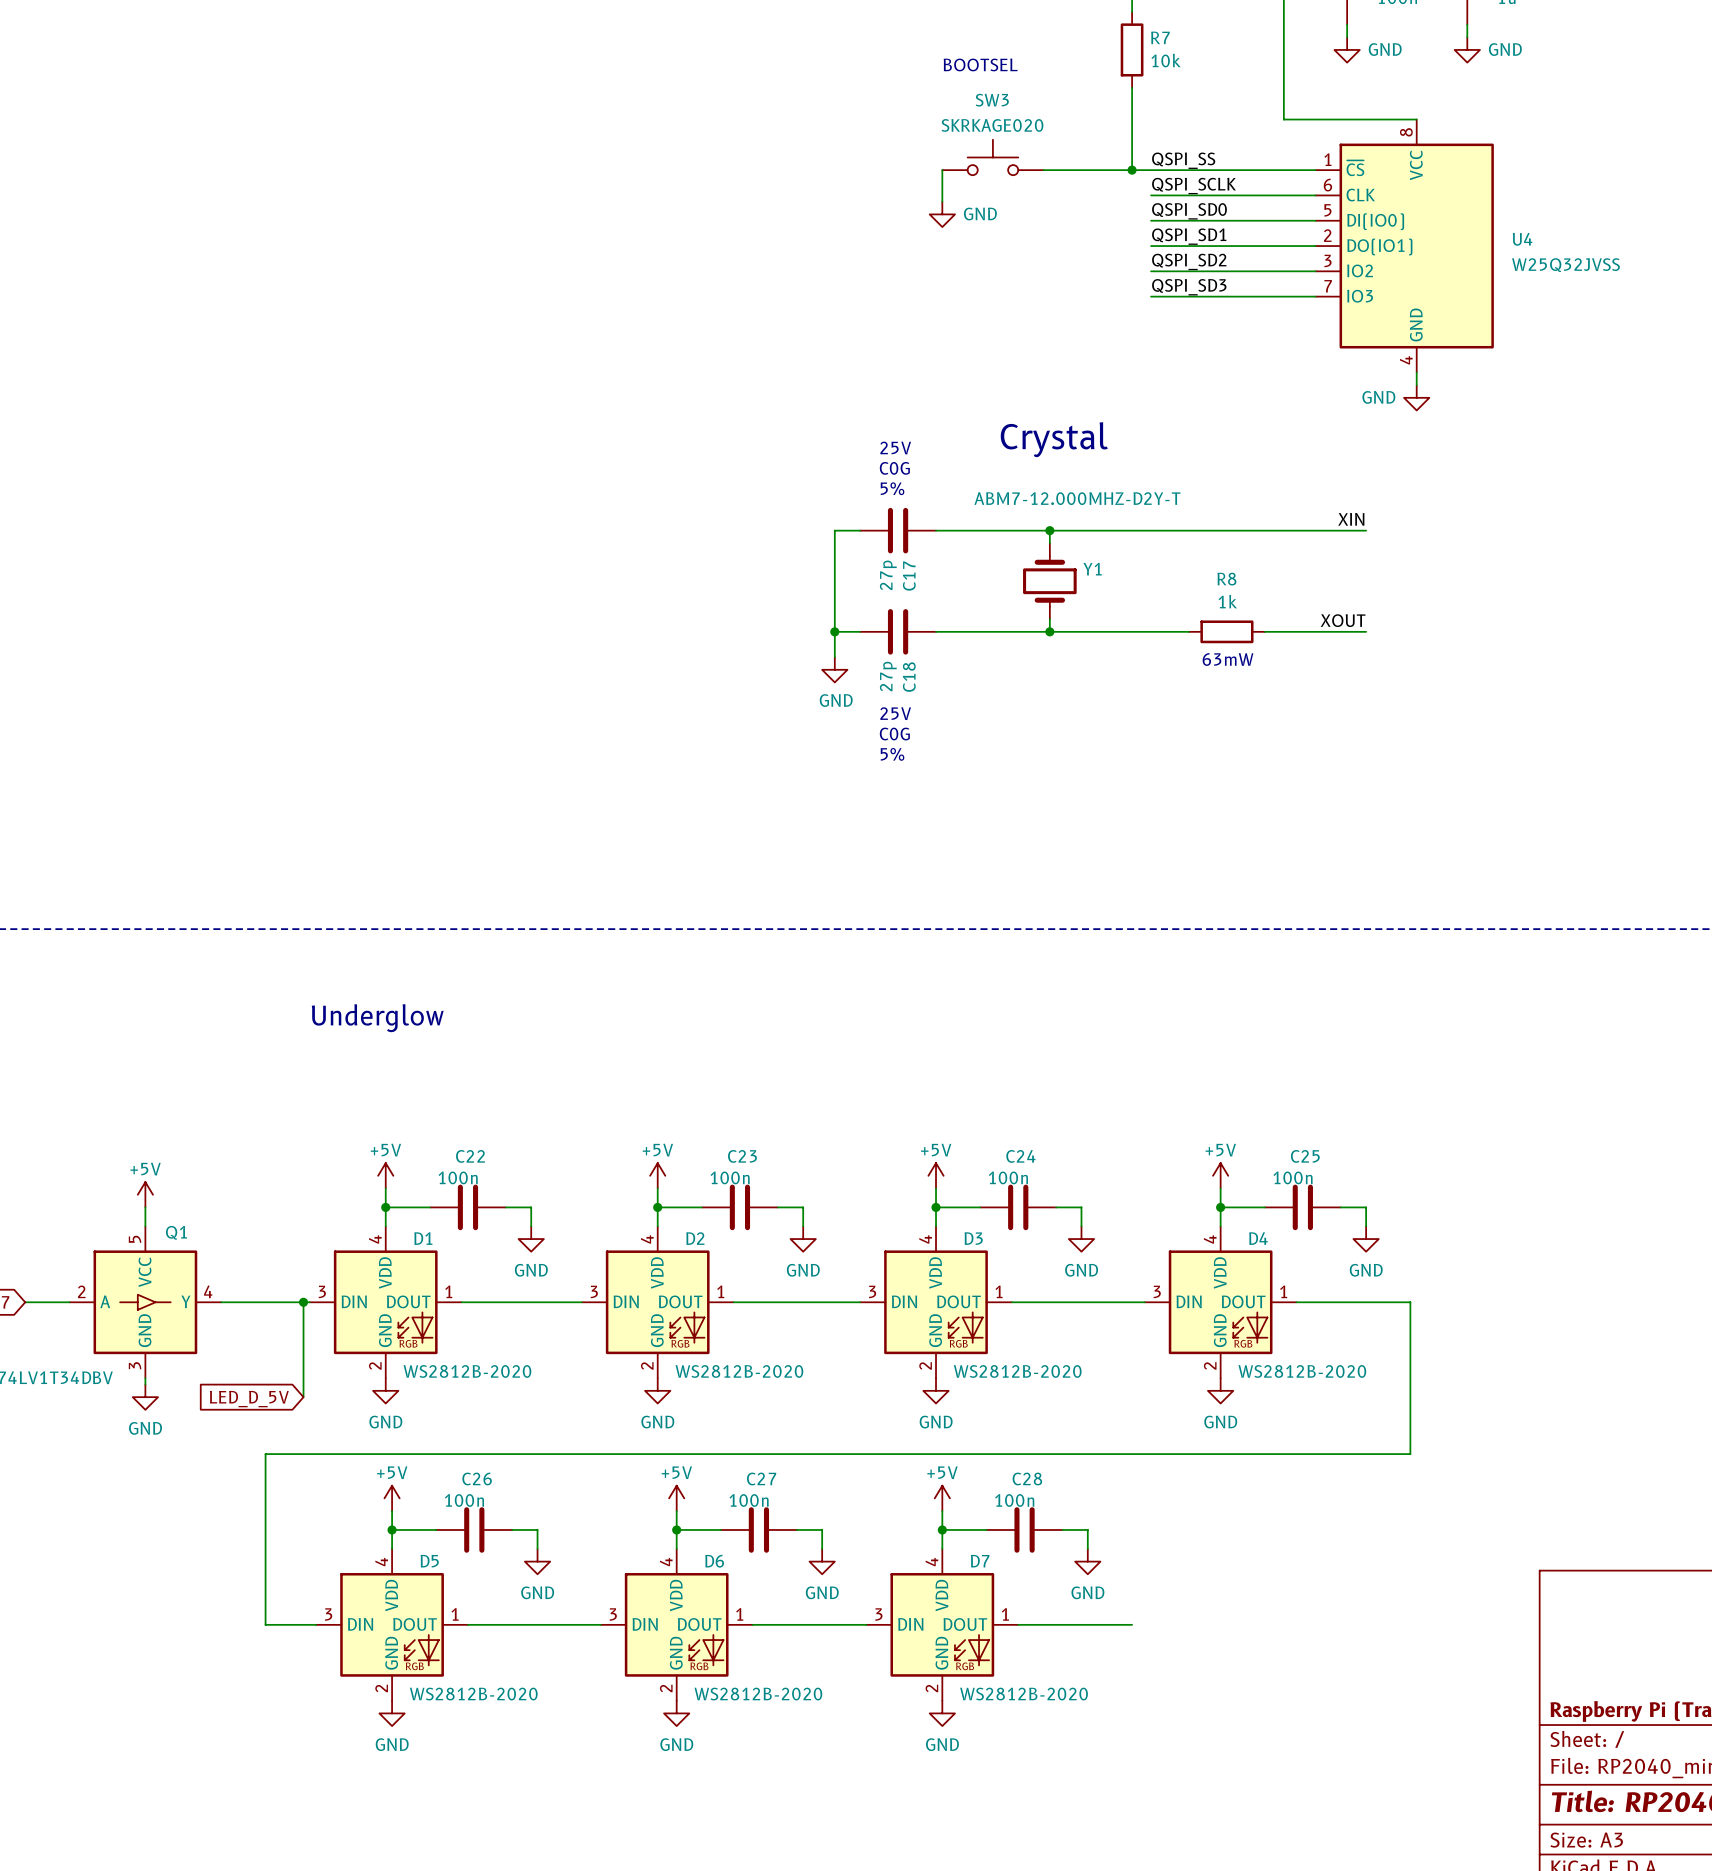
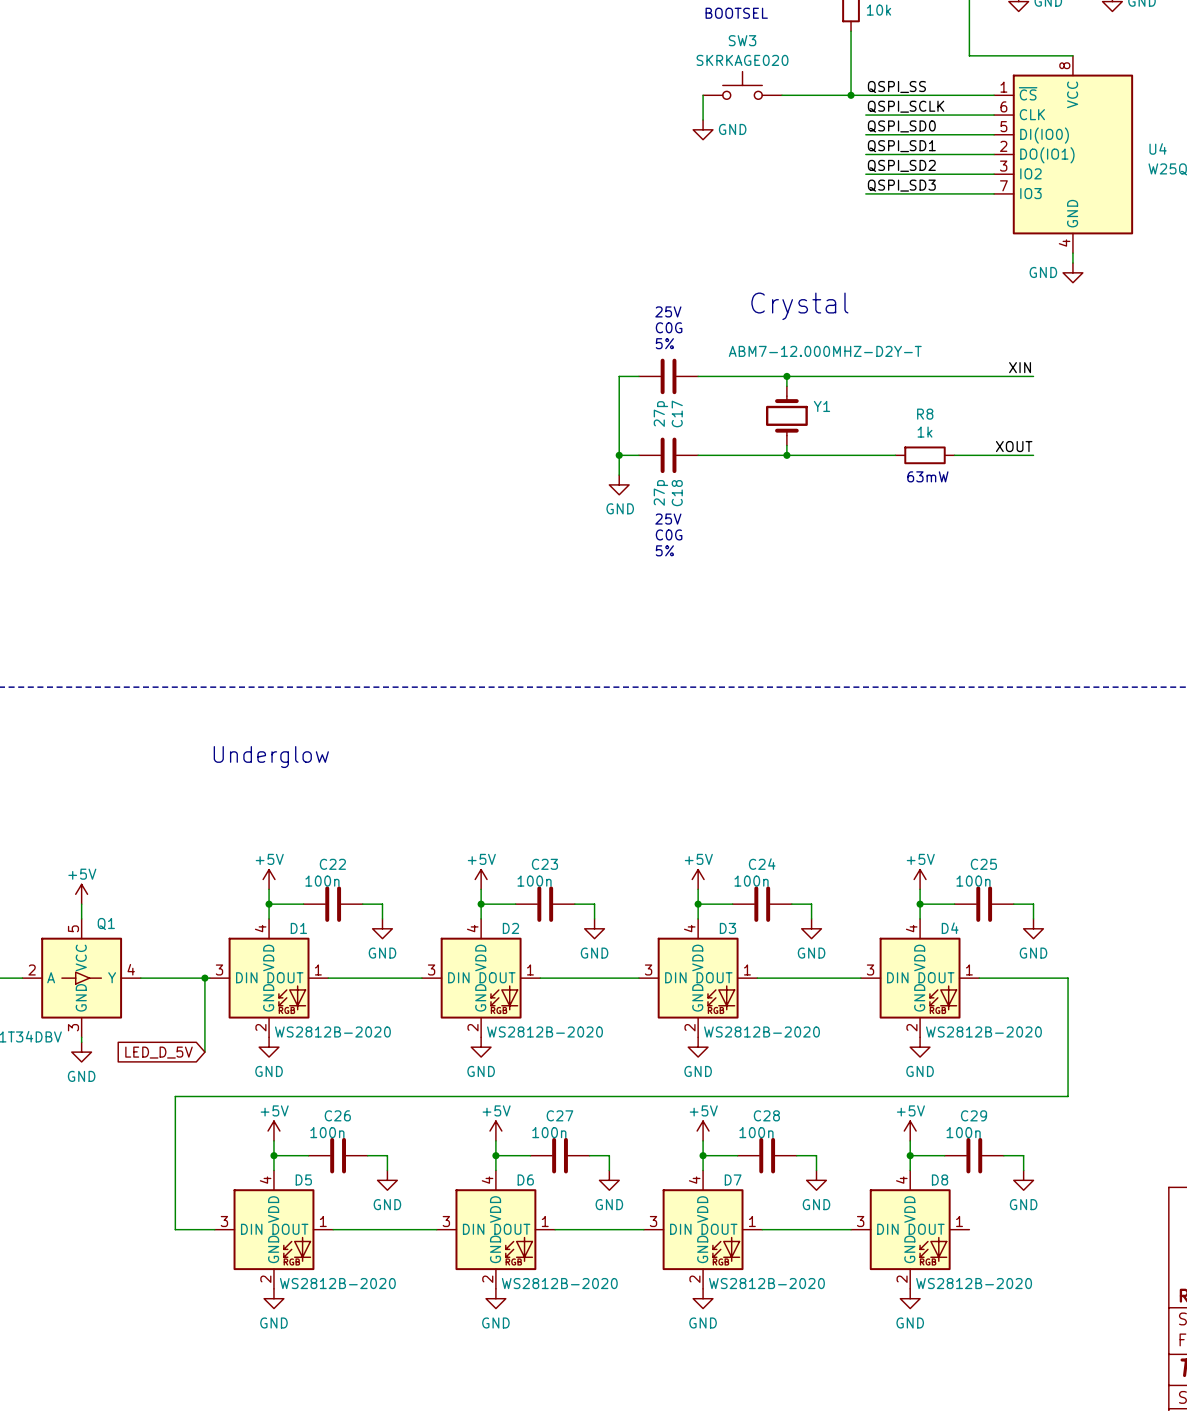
power symbol: none -> +5V (910, 1131)
wire: none -> (910, 1140) (910, 1170)
wire: none -> (910, 1155) (944, 1155)
junction: none -> (910, 1155)
C29: none -> 100n (974, 1155)
wire: none -> (1003, 1155) (1023, 1155) (1023, 1170)
power symbol: none -> GND (1023, 1180)
D8: none -> WS2812B-2020 (910, 1229)
power symbol: none -> GND (910, 1298)

